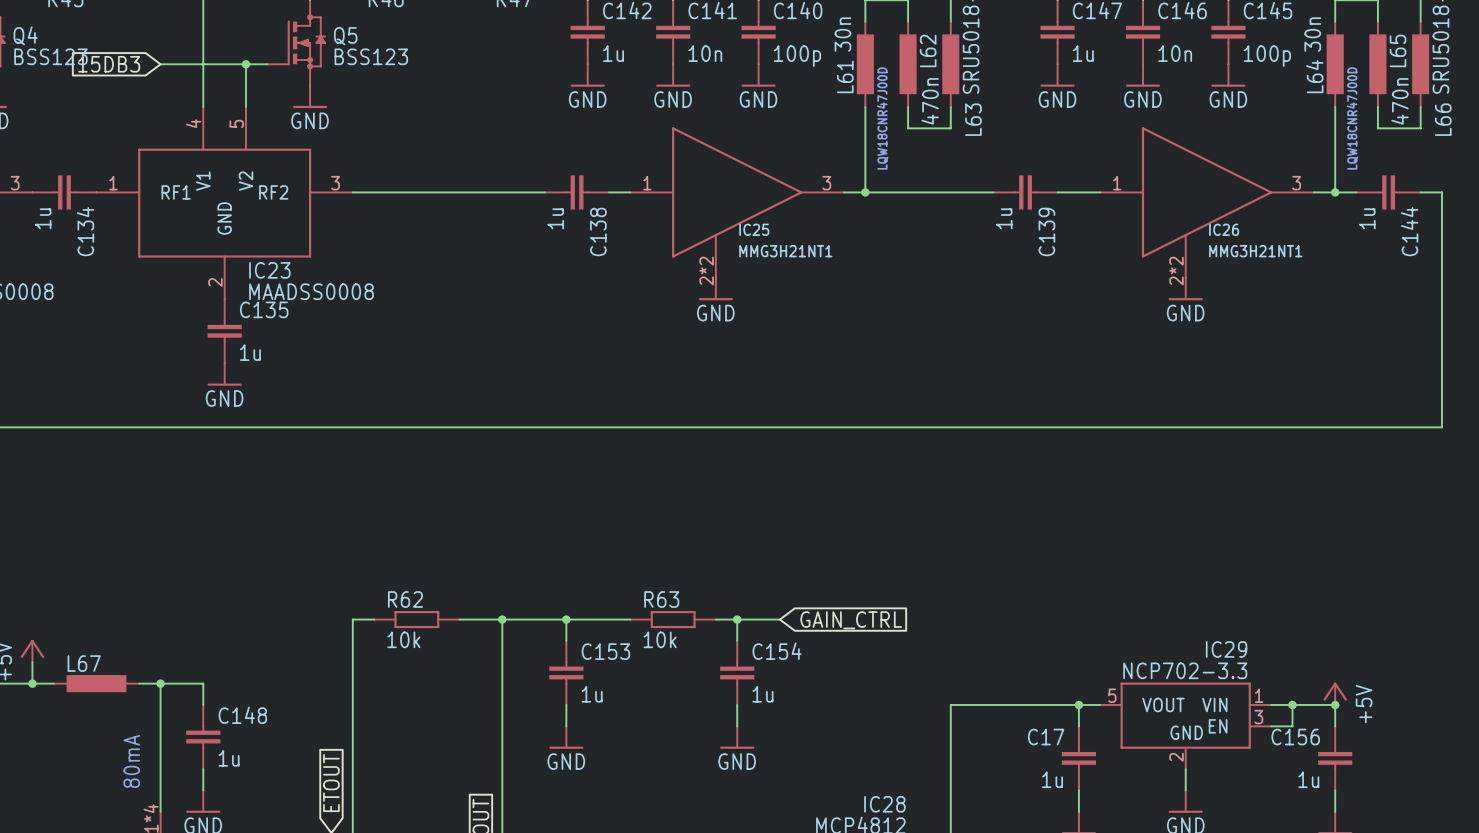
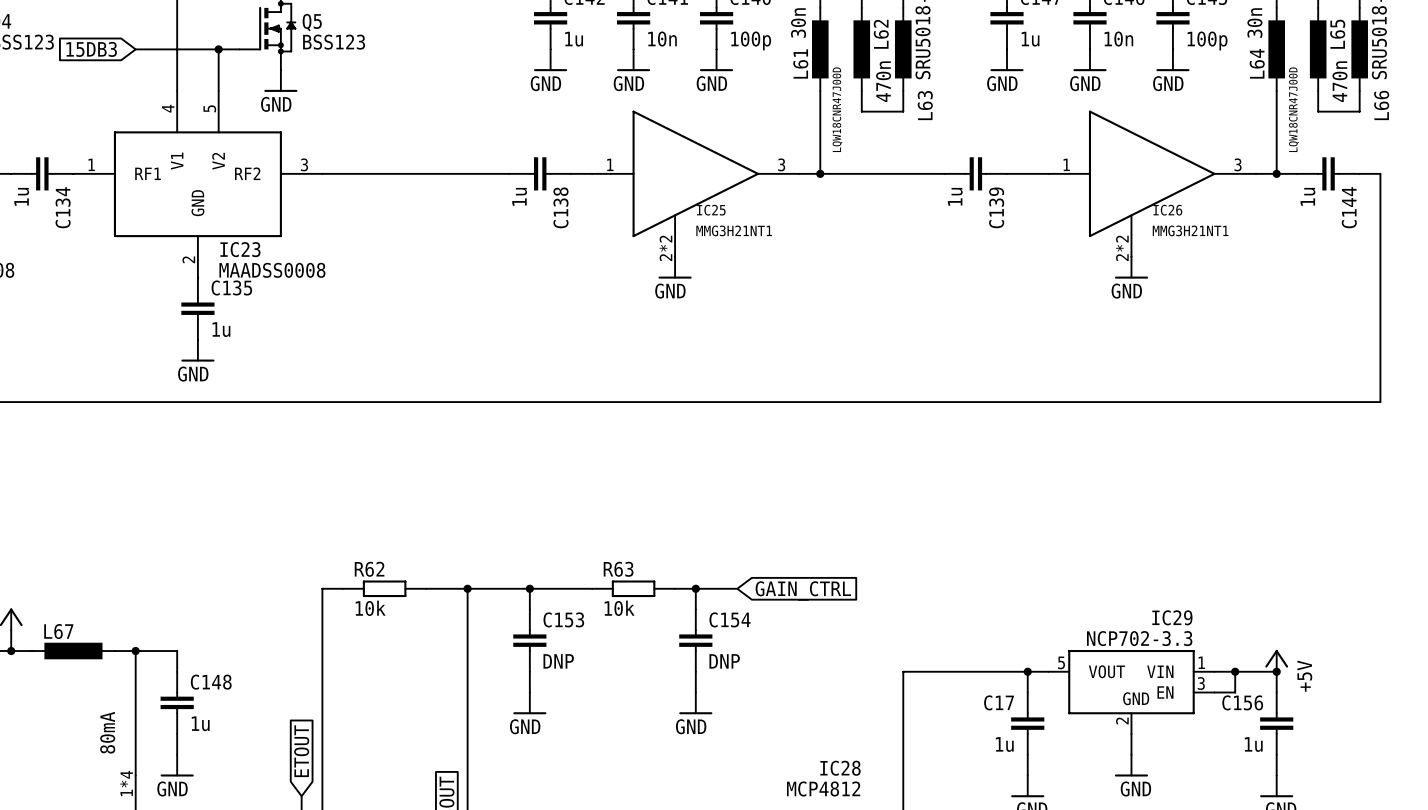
C153 value: 1u (592, 694) -> DNP (558, 661)
C154 value: 1u (763, 694) -> DNP (724, 661)

